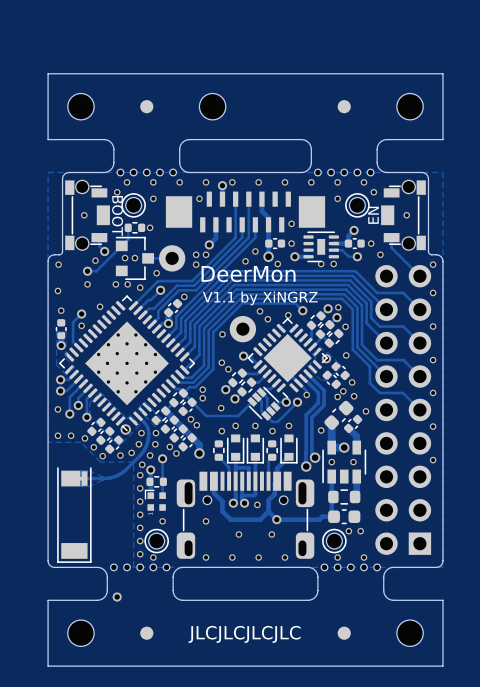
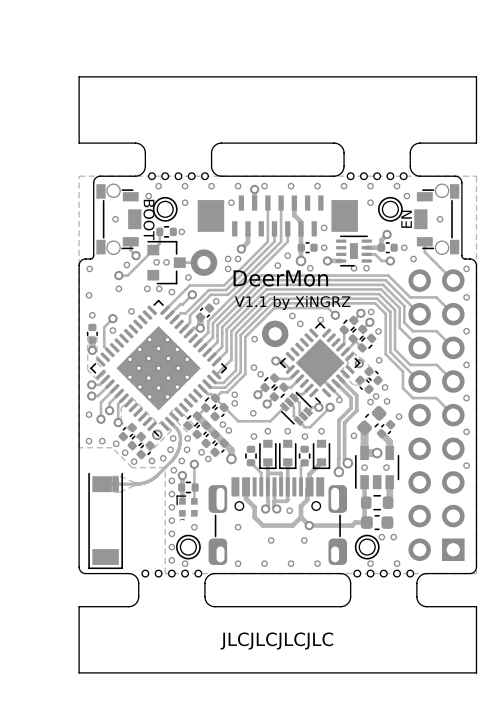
part: (80, 106) -> none
part: (146, 106) -> none
part: (212, 106) -> none
part: (344, 106) -> none
part: (410, 106) -> none
via: (117, 597) -> none
part: (80, 633) -> none
part: (146, 633) -> none
part: (344, 633) -> none
part: (410, 633) -> none

